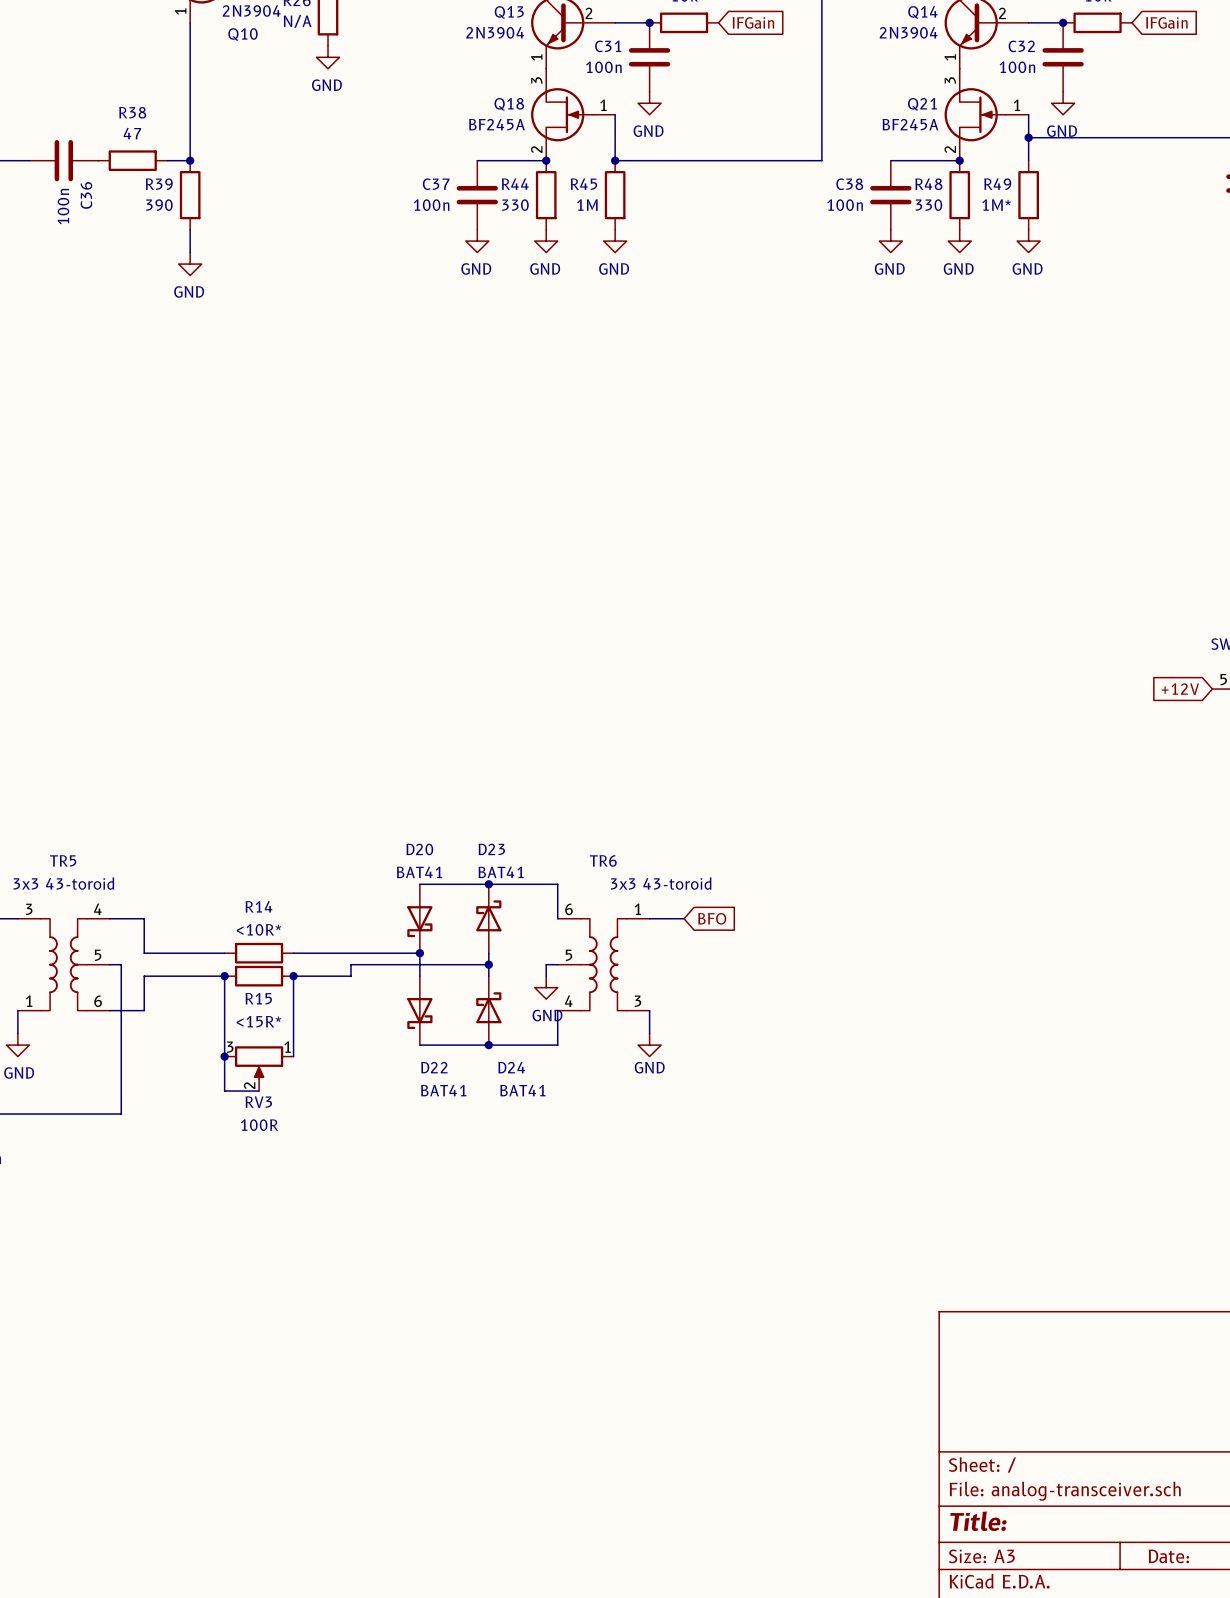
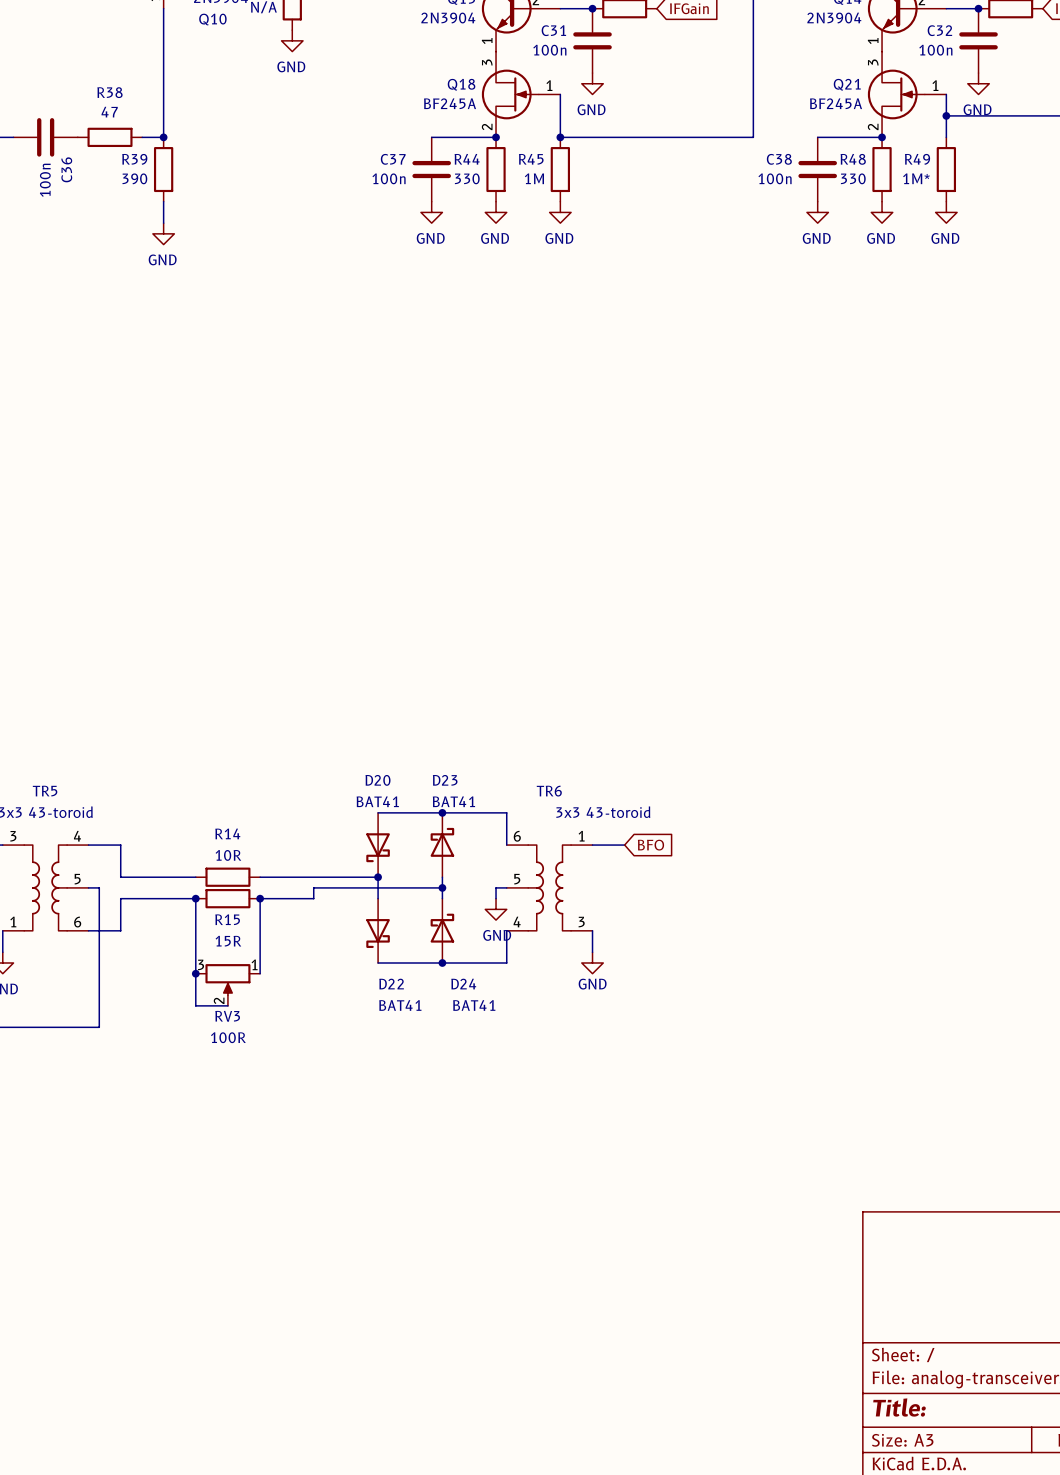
R14 value: <10R* (259, 929) -> 10R (228, 855)
R15 value: <15R* (259, 1021) -> 15R (228, 941)

